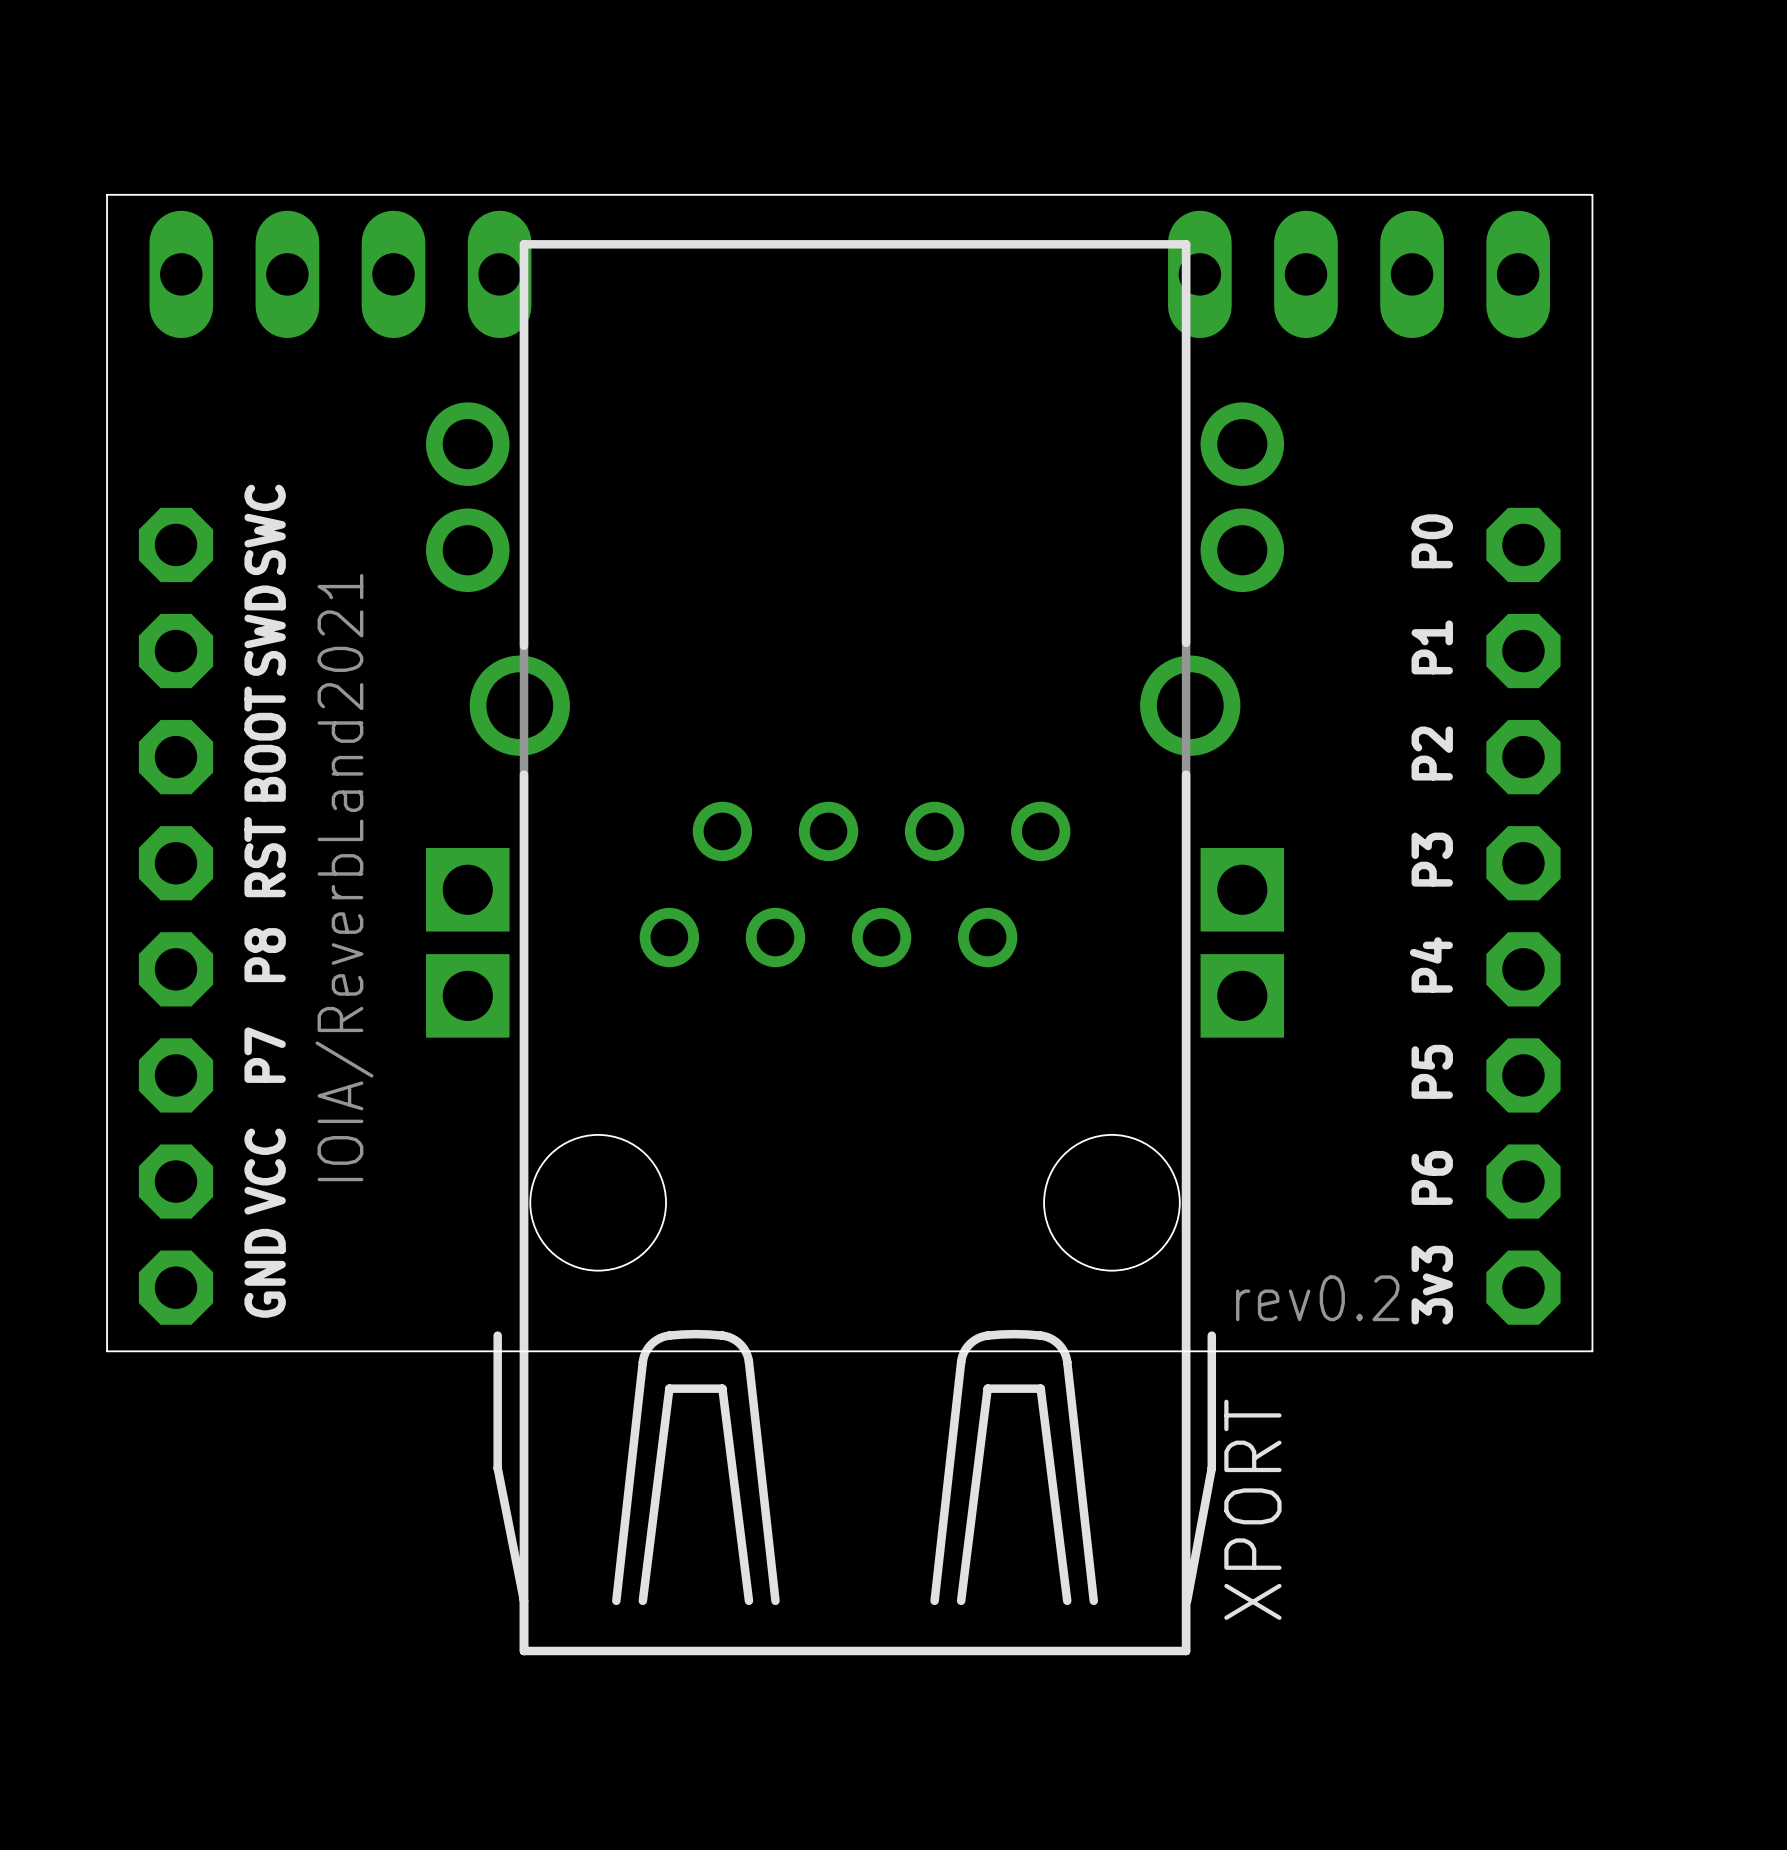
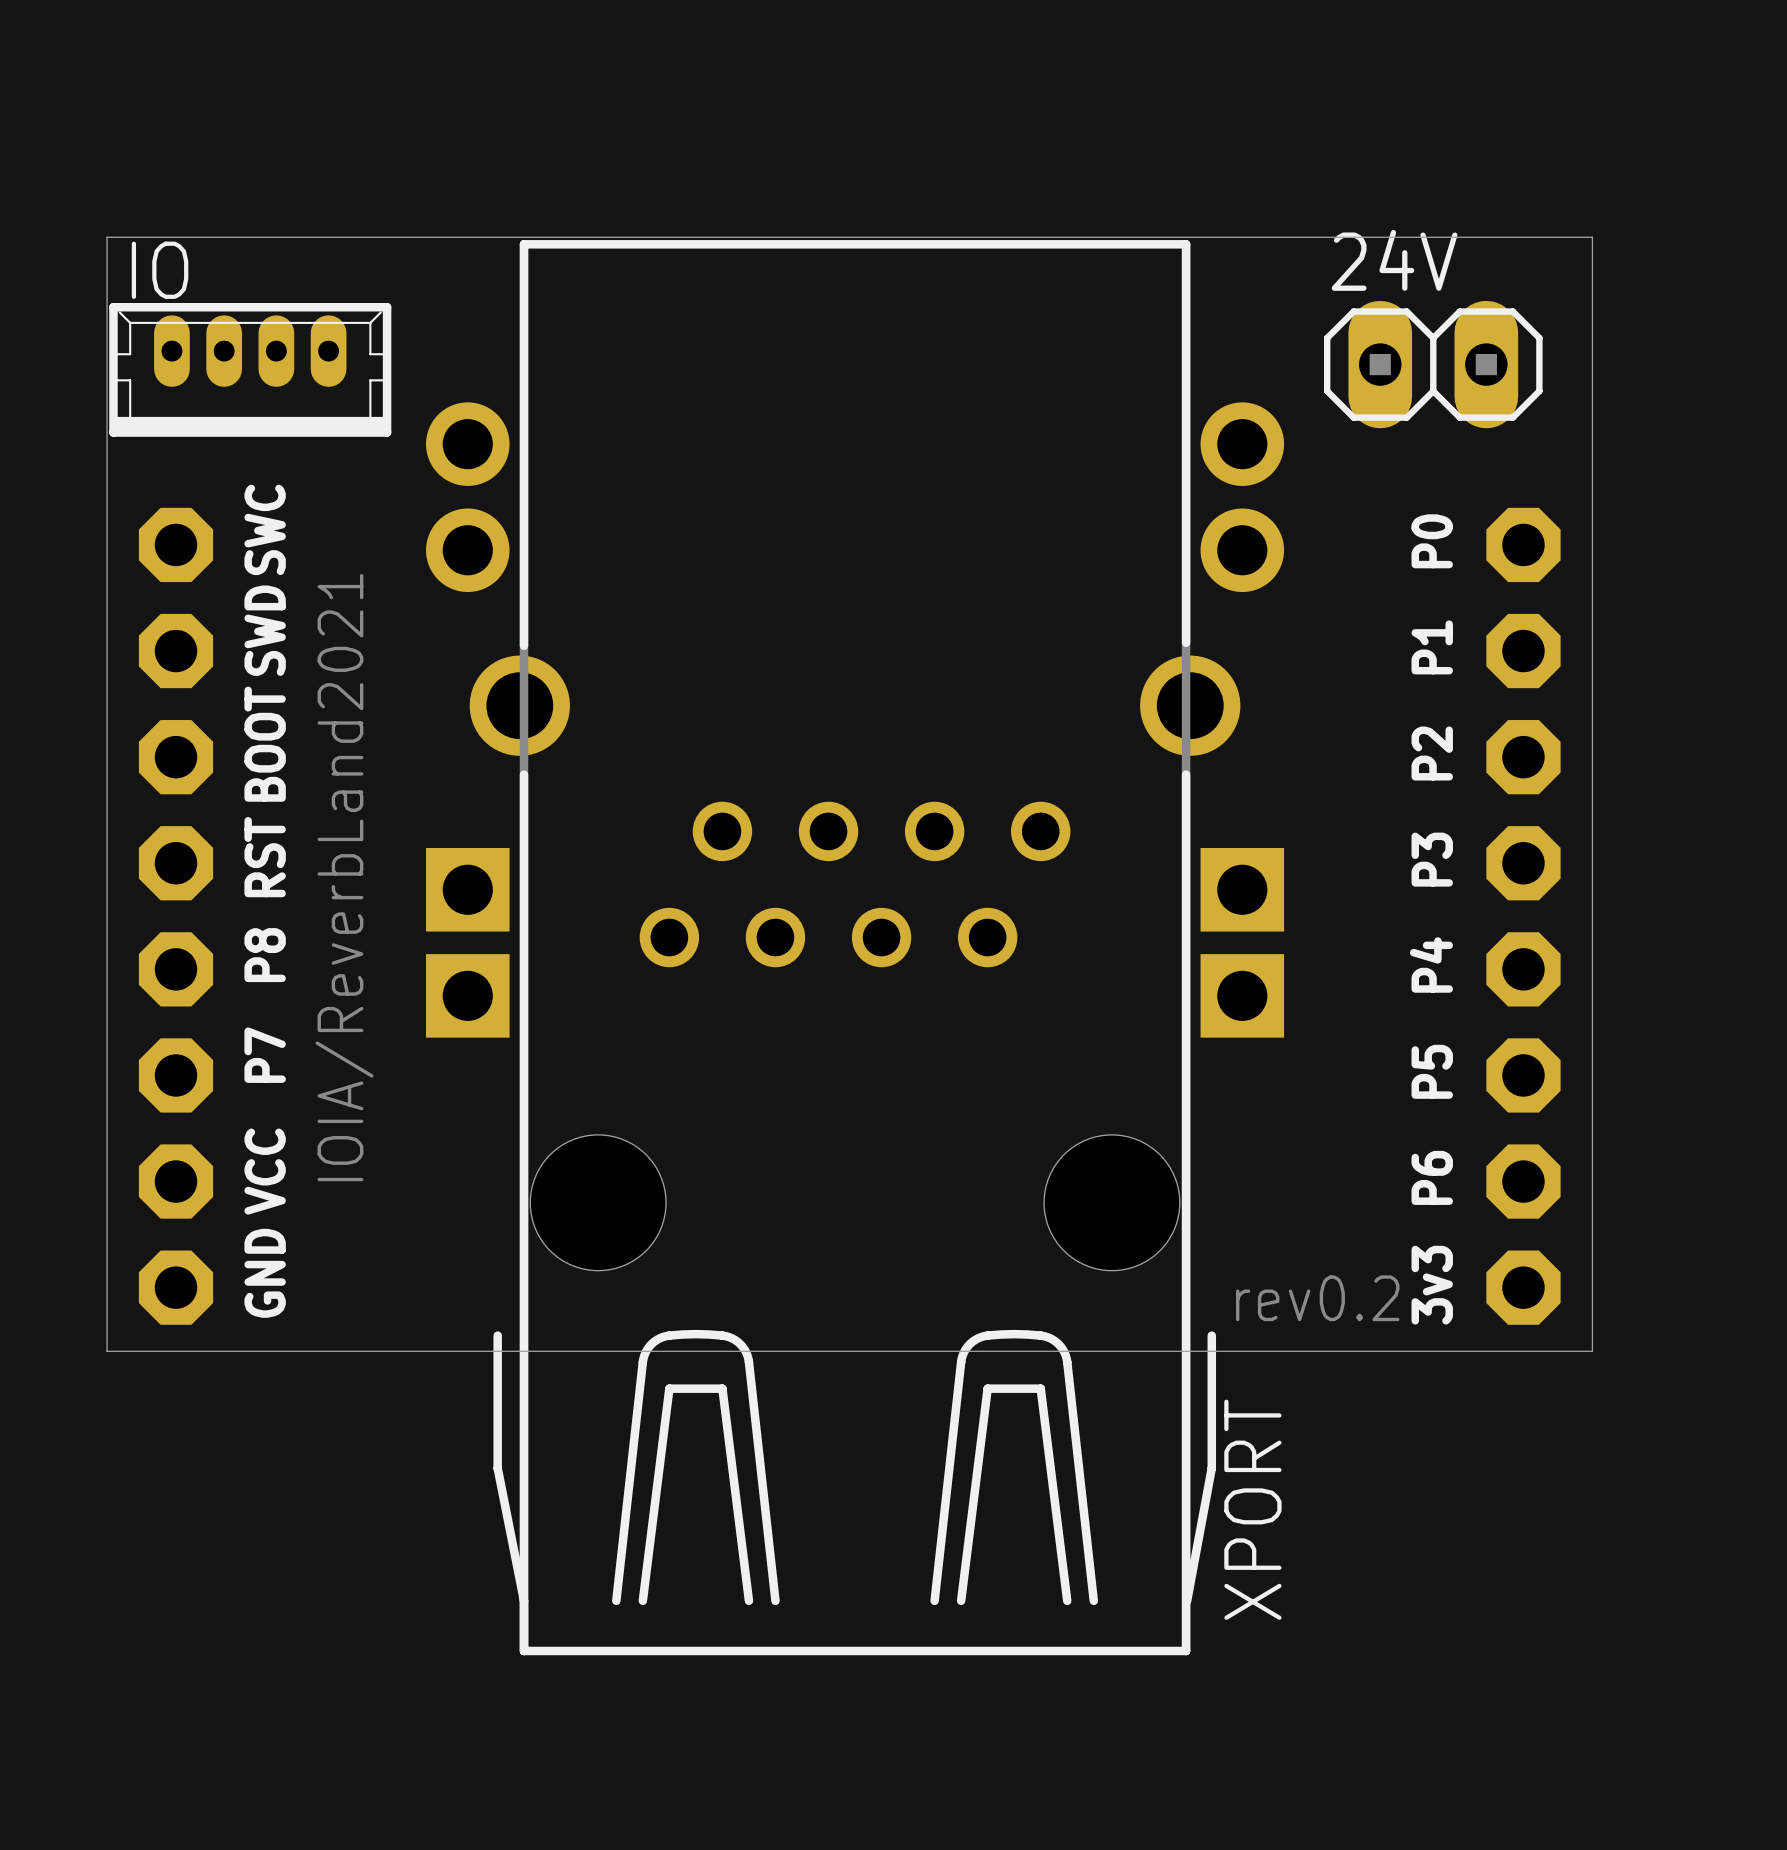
board edge: (1592, 237) (1592, 194) (107, 194) (107, 237) -> (1592, 237) (107, 237)
part: (340, 274) -> none
part: (1359, 274) -> none
24V: none -> (1433, 364)
IO: none -> (250, 369)

